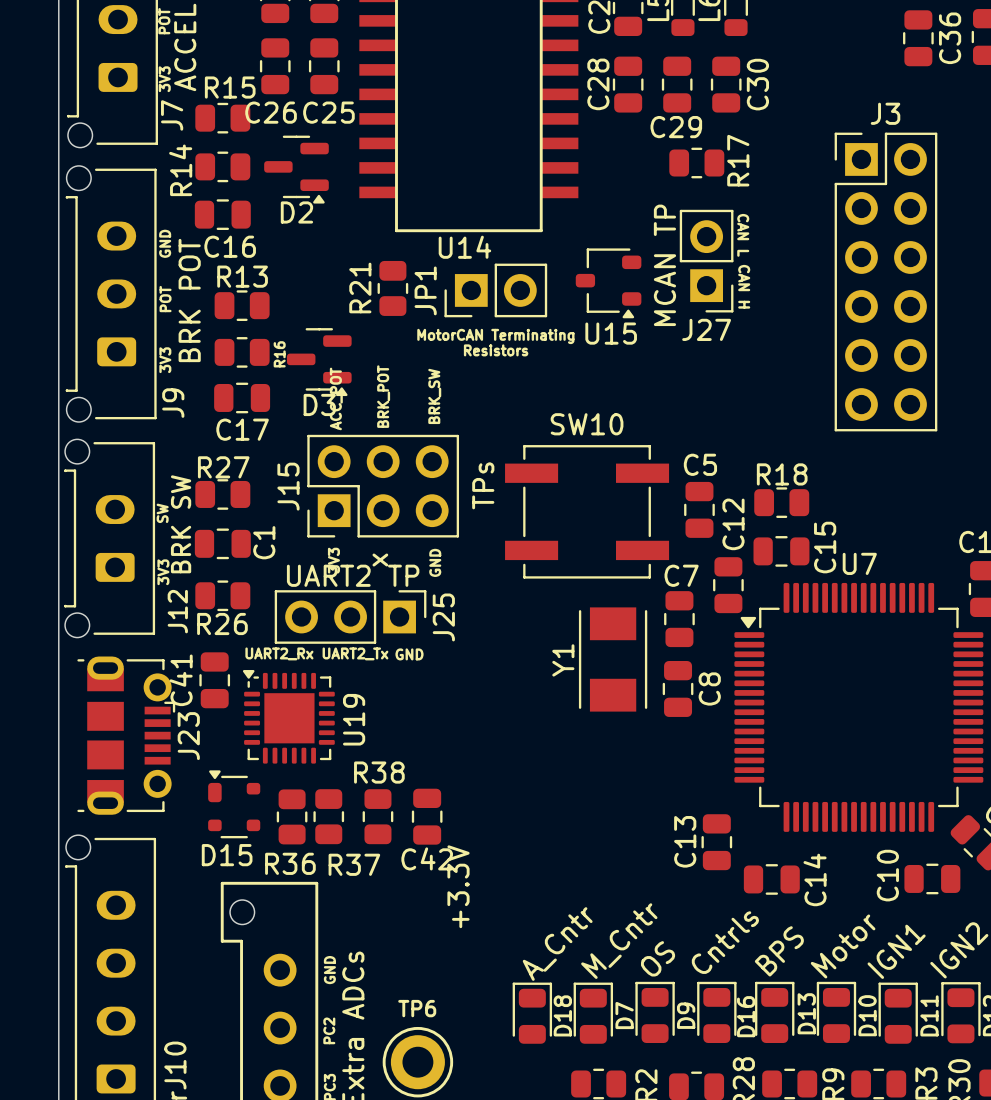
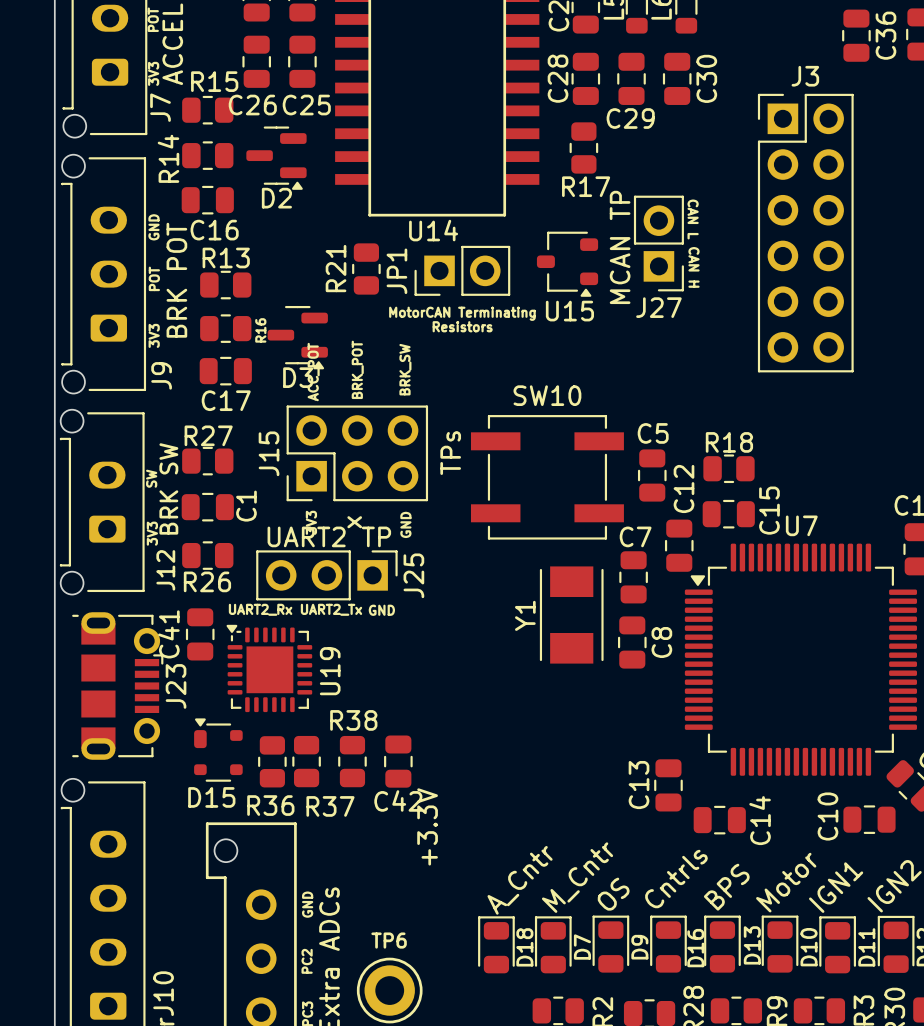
R17 rotation: 0° (696, 163) -> 90° clockwise (583, 147)
R17 position: (696, 163) -> (583, 147)
J3 position: (885, 281) -> (805, 233)

